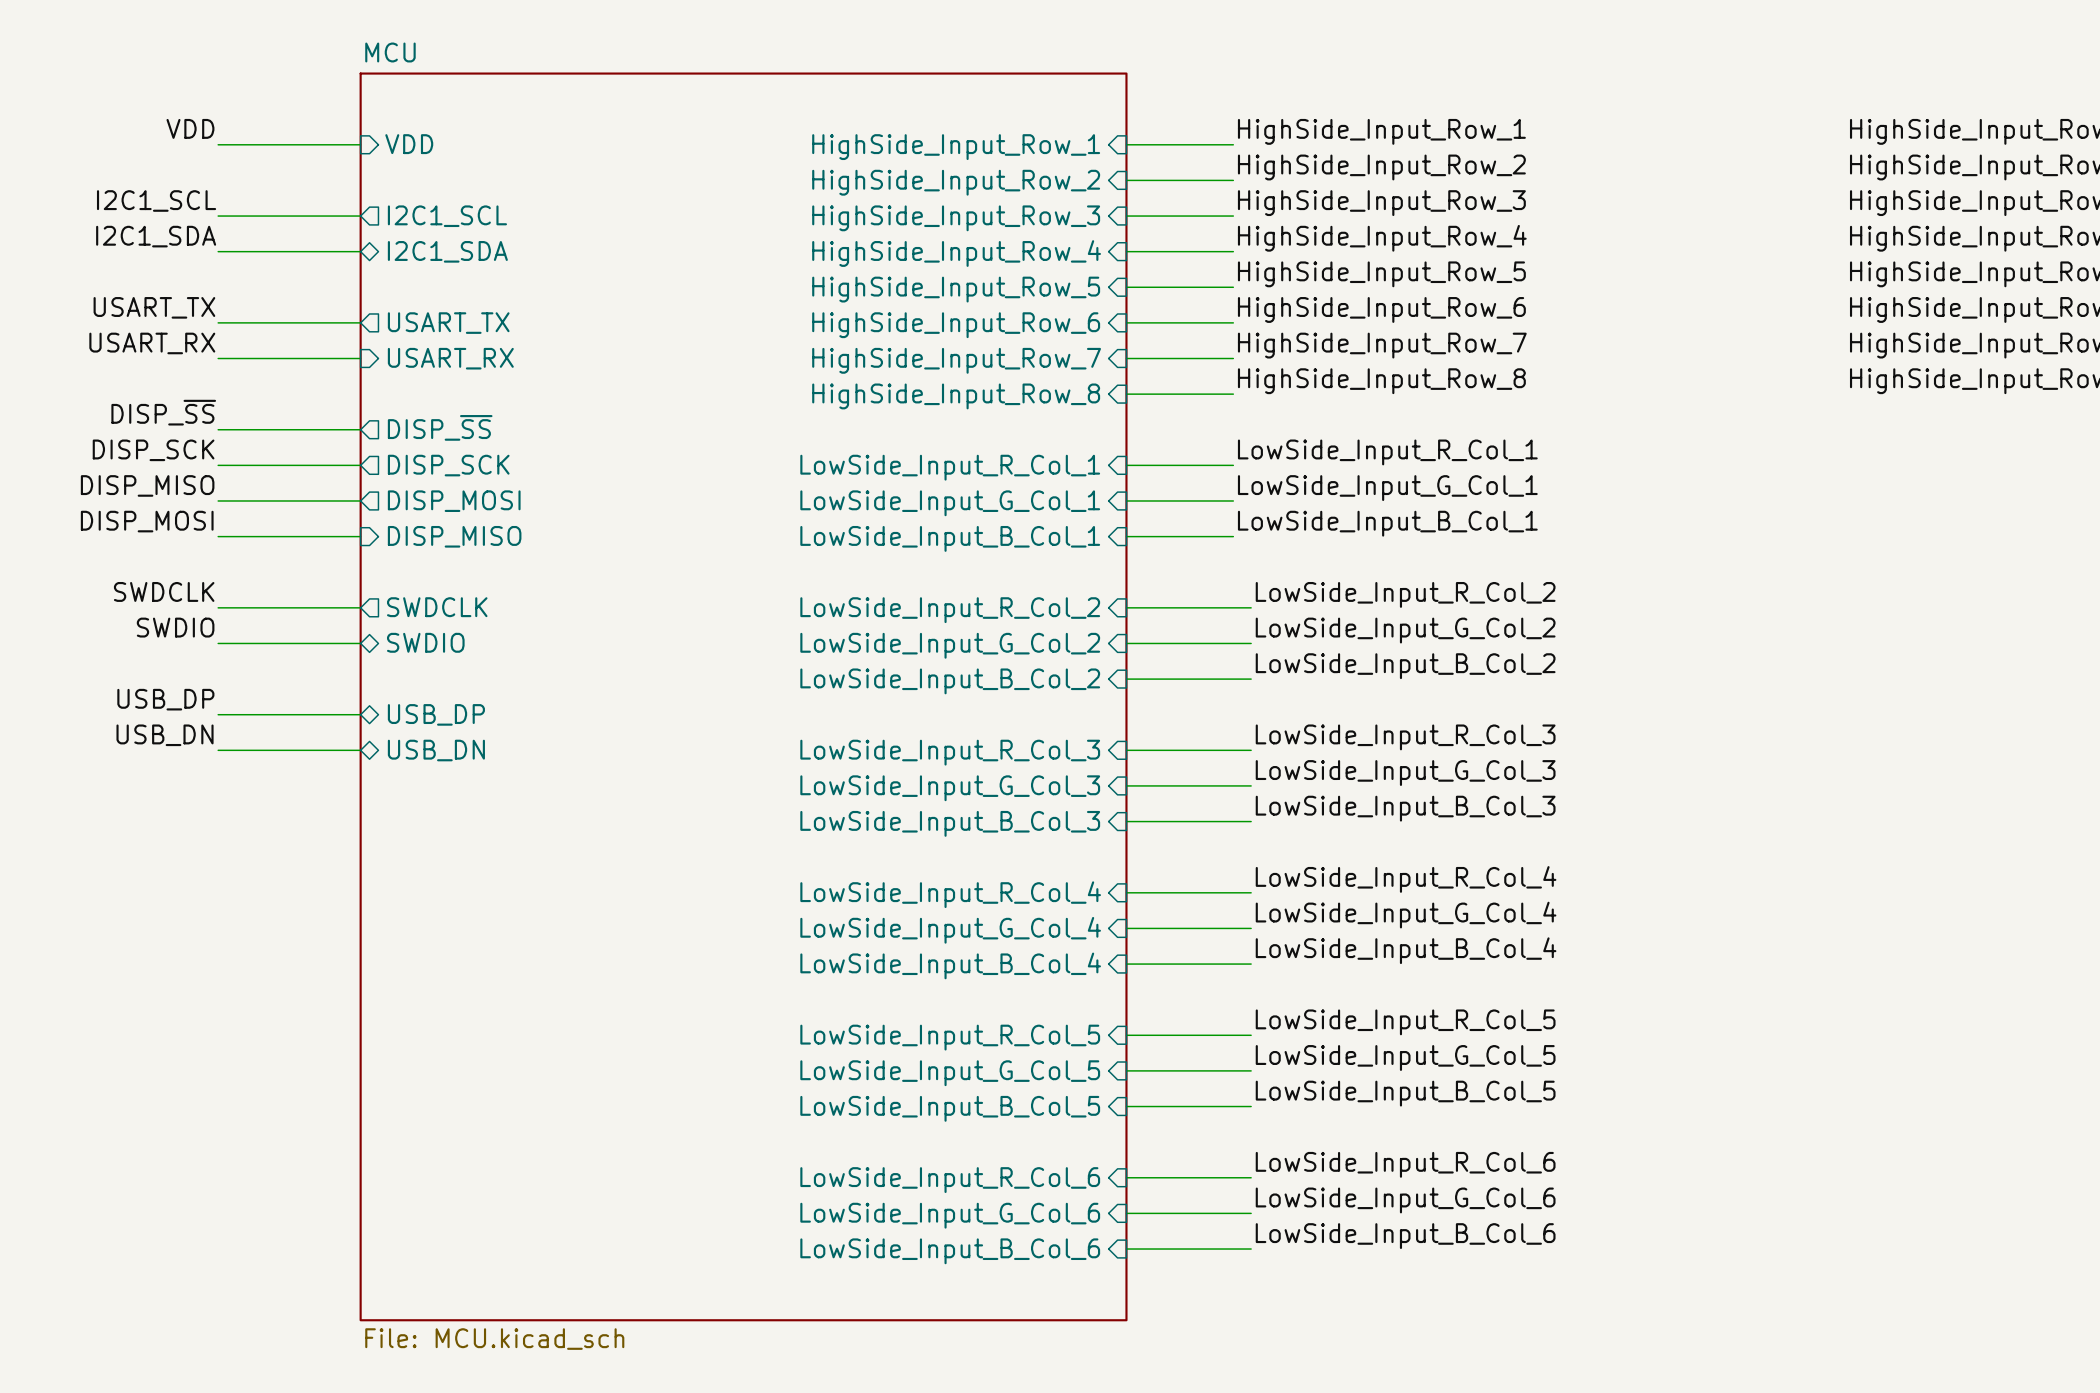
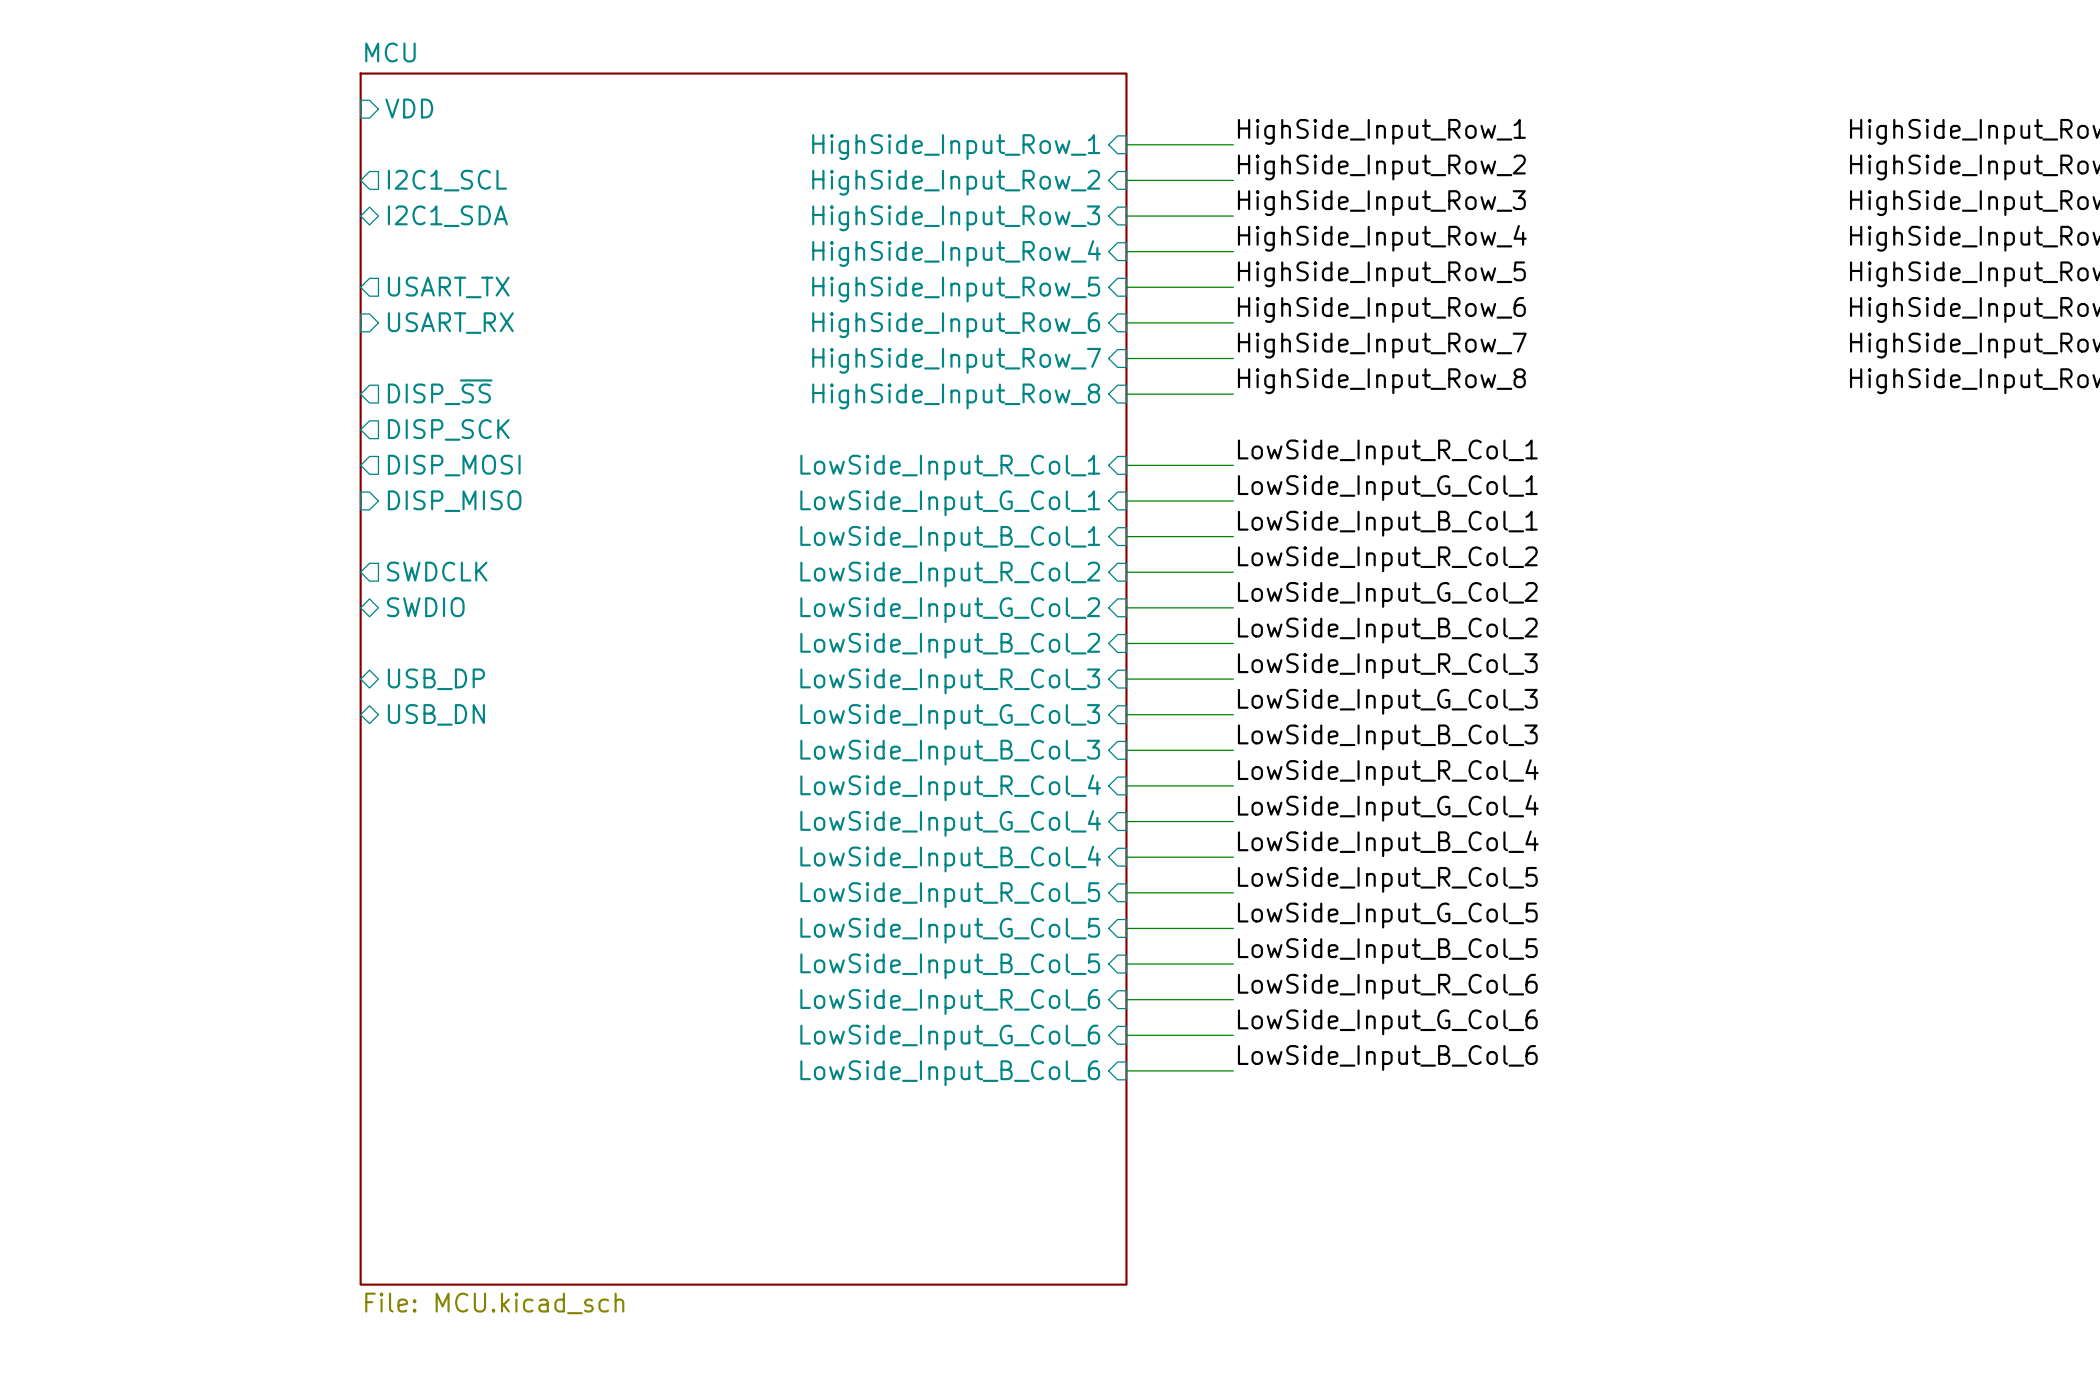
label: VDD (190, 128) -> none
wire: (218, 144) (360, 144) -> none
sheet pin position: VDD (409, 144) -> VDD (409, 108)
sheet pin: none -> I2C1_SCL (447, 180)
label: I2C1_SCL (156, 200) -> none
wire: (218, 216) (360, 216) -> none
sheet pin shape: output (447, 216) -> bidirectional (447, 216)
sheet pin: I2C1_SCL (447, 216) -> I2C1_SDA (447, 216)
label: I2C1_SDA (156, 236) -> none
wire: (218, 251) (360, 251) -> none
sheet pin: I2C1_SDA (447, 251) -> none
sheet pin: none -> USART_TX (448, 287)
label: USART_TX (154, 307) -> none
wire: (218, 322) (360, 322) -> none
sheet pin shape: output (448, 323) -> input (450, 323)
sheet pin: USART_TX (448, 323) -> USART_RX (450, 323)
label: USART_RX (152, 343) -> none
wire: (218, 358) (360, 358) -> none
sheet pin: USART_RX (450, 358) -> none
sheet pin: none -> DISP_~{SS} (440, 392)
label: DISP_~{SS} (163, 412) -> none
sheet pin: DISP_~{SS} (440, 427) -> DISP_SCK (448, 429)
wire: (218, 429) (360, 429) -> none
label: DISP_SCK (153, 450) -> none
wire: (218, 465) (360, 465) -> none
sheet pin: DISP_SCK (448, 465) -> DISP_MOSI (454, 465)
label: DISP_MISO (147, 485) -> none
wire: (218, 500) (360, 500) -> none
sheet pin shape: output (454, 501) -> input (454, 501)
sheet pin: DISP_MOSI (454, 501) -> DISP_MISO (454, 501)
label: DISP_MOSI (147, 521) -> none
wire: (218, 536) (360, 536) -> none
sheet pin: DISP_MISO (454, 536) -> none
sheet pin: none -> SWDCLK (437, 571)
wire: none -> (1126, 572) (1233, 572)
sheet pin: none -> LowSide_Input_R_Col_2 (950, 574)
label: SWDCLK (164, 591) -> none
label position: LowSide_Input_R_Col_2 (1405, 594) -> LowSide_Input_R_Col_2 (1387, 559)
wire: (218, 607) (360, 607) -> none
sheet pin shape: output (437, 607) -> bidirectional (425, 607)
sheet pin: SWDCLK (437, 607) -> SWDIO (425, 607)
wire: (1233, 607) (1251, 607) -> none
sheet pin: LowSide_Input_R_Col_2 (950, 610) -> LowSide_Input_G_Col_2 (950, 610)
label: SWDIO (175, 627) -> none
label position: LowSide_Input_G_Col_2 (1405, 630) -> LowSide_Input_G_Col_2 (1387, 594)
sheet pin: SWDIO (425, 642) -> none
wire: (218, 643) (360, 643) -> none
wire: (1233, 643) (1251, 643) -> none
sheet pin: LowSide_Input_G_Col_2 (950, 645) -> LowSide_Input_B_Col_2 (950, 645)
label position: LowSide_Input_B_Col_2 (1405, 666) -> LowSide_Input_B_Col_2 (1387, 630)
sheet pin: none -> USB_DP (436, 679)
sheet MCU: none -> File: MCU.kicad_sch (743, 679)
wire: (1233, 679) (1251, 679) -> none
sheet pin: LowSide_Input_B_Col_2 (950, 681) -> LowSide_Input_R_Col_3 (950, 681)
sheet MCU: File: MCU.kicad_sch (743, 696) -> none
label: USB_DP (165, 699) -> none
wire: (218, 714) (360, 714) -> none
sheet pin: USB_DP (436, 714) -> USB_DN (436, 714)
wire: none -> (1126, 714) (1233, 714)
sheet pin: none -> LowSide_Input_G_Col_3 (950, 717)
label: USB_DN (165, 735) -> none
label position: LowSide_Input_R_Col_3 (1405, 737) -> LowSide_Input_R_Col_3 (1387, 666)
wire: (218, 750) (360, 750) -> none
sheet pin: USB_DN (436, 750) -> none
wire: (1233, 750) (1251, 750) -> none
sheet pin: LowSide_Input_R_Col_3 (950, 752) -> LowSide_Input_B_Col_3 (950, 752)
label position: LowSide_Input_G_Col_3 (1405, 773) -> LowSide_Input_G_Col_3 (1387, 701)
wire: (1233, 785) (1251, 785) -> none
sheet pin: LowSide_Input_G_Col_3 (950, 788) -> LowSide_Input_R_Col_4 (950, 787)
label position: LowSide_Input_B_Col_3 (1405, 808) -> LowSide_Input_B_Col_3 (1387, 737)
wire: (1233, 821) (1251, 821) -> none
sheet pin: LowSide_Input_B_Col_3 (950, 823) -> LowSide_Input_G_Col_4 (950, 823)
wire: none -> (1126, 857) (1233, 857)
sheet pin: none -> LowSide_Input_B_Col_4 (950, 859)
label position: LowSide_Input_R_Col_4 (1406, 879) -> LowSide_Input_R_Col_4 (1388, 772)
wire: (1233, 892) (1251, 892) -> none
sheet pin: LowSide_Input_R_Col_4 (950, 894) -> LowSide_Input_R_Col_5 (950, 895)
label position: LowSide_Input_G_Col_4 (1406, 915) -> LowSide_Input_G_Col_4 (1388, 808)
wire: (1233, 928) (1251, 928) -> none
sheet pin: LowSide_Input_G_Col_4 (950, 930) -> LowSide_Input_G_Col_5 (950, 930)
label position: LowSide_Input_B_Col_4 (1406, 950) -> LowSide_Input_B_Col_4 (1388, 843)
wire: (1233, 964) (1251, 964) -> none
sheet pin: LowSide_Input_B_Col_4 (950, 965) -> LowSide_Input_B_Col_5 (950, 966)
wire: none -> (1126, 999) (1233, 999)
label position: LowSide_Input_R_Col_5 (1405, 1022) -> LowSide_Input_R_Col_5 (1387, 879)
wire: (1233, 1035) (1251, 1035) -> none
sheet pin: LowSide_Input_R_Col_5 (950, 1037) -> LowSide_Input_G_Col_6 (950, 1037)
label position: LowSide_Input_G_Col_5 (1405, 1057) -> LowSide_Input_G_Col_5 (1387, 915)
wire: (1233, 1070) (1251, 1070) -> none
sheet pin: LowSide_Input_G_Col_5 (950, 1073) -> LowSide_Input_B_Col_6 (950, 1073)
label position: LowSide_Input_B_Col_5 (1405, 1093) -> LowSide_Input_B_Col_5 (1387, 951)
wire: (1126, 1106) (1251, 1106) -> none
sheet pin: LowSide_Input_B_Col_5 (950, 1108) -> none
label position: LowSide_Input_R_Col_6 (1405, 1164) -> LowSide_Input_R_Col_6 (1387, 986)
wire: (1126, 1177) (1251, 1177) -> none
sheet pin position: LowSide_Input_R_Col_6 (950, 1180) -> LowSide_Input_R_Col_6 (950, 1001)
label position: LowSide_Input_G_Col_6 (1405, 1200) -> LowSide_Input_G_Col_6 (1387, 1022)
wire: (1126, 1213) (1251, 1213) -> none
sheet pin: LowSide_Input_G_Col_6 (950, 1215) -> none
label position: LowSide_Input_B_Col_6 (1405, 1236) -> LowSide_Input_B_Col_6 (1387, 1057)
wire: (1126, 1249) (1251, 1249) -> none
sheet pin: LowSide_Input_B_Col_6 (950, 1251) -> none

